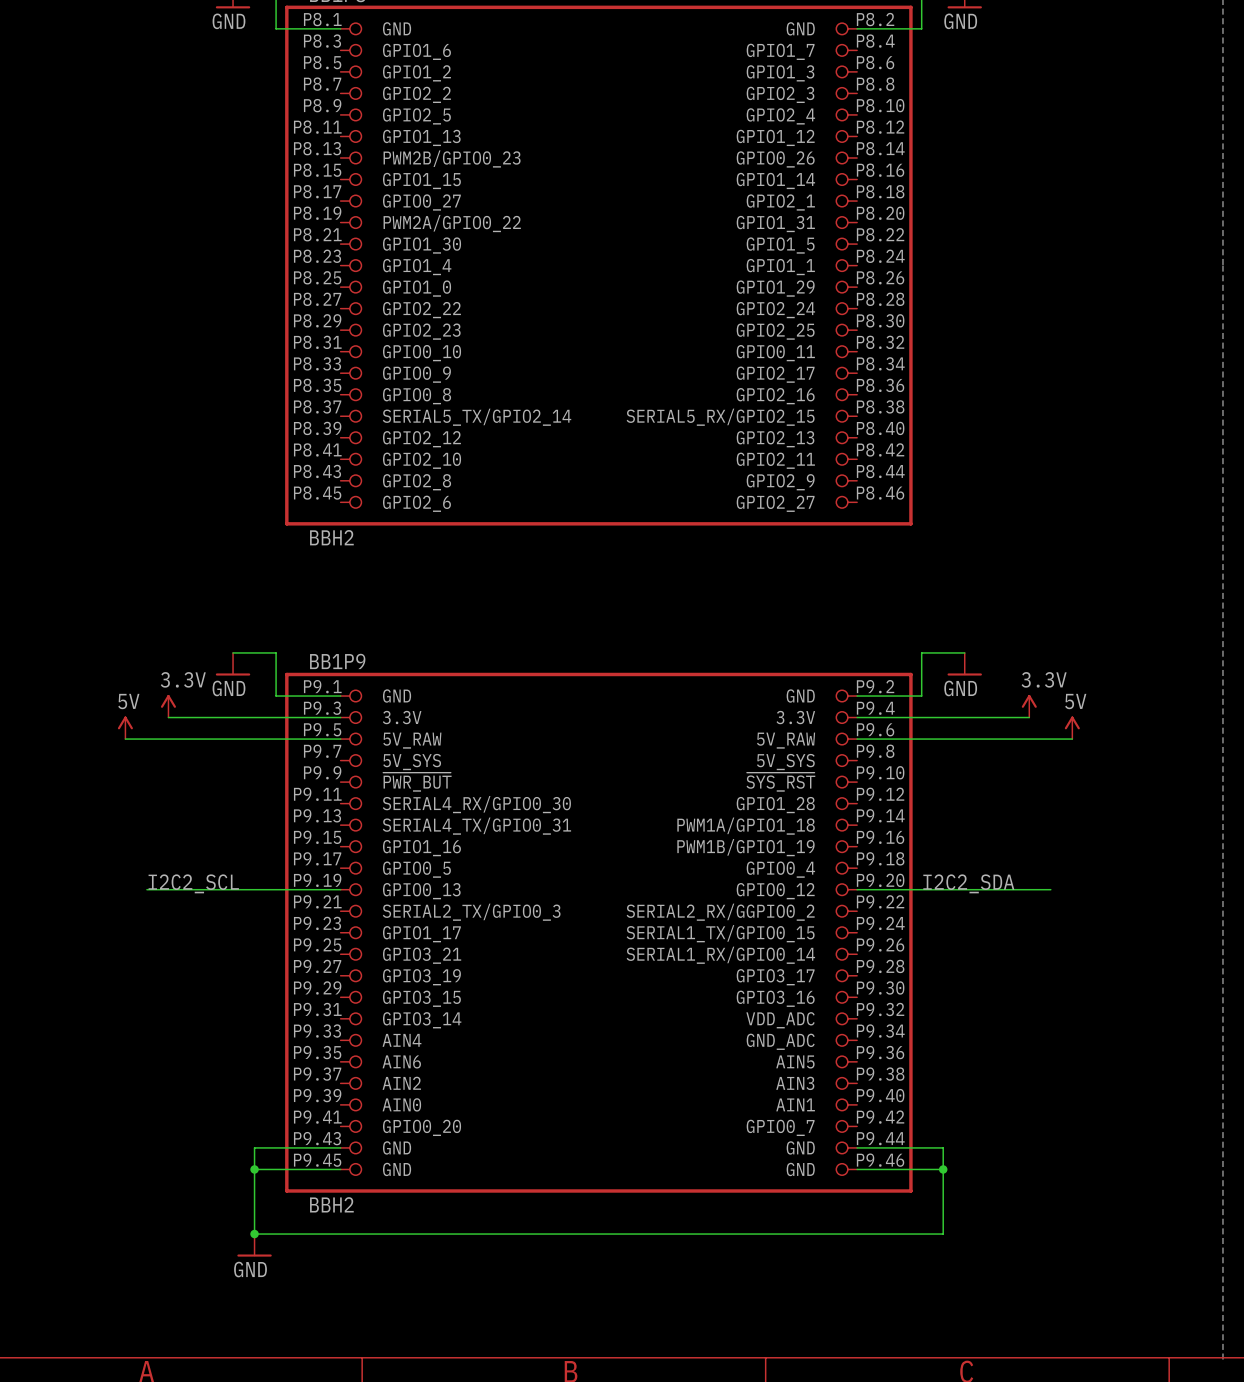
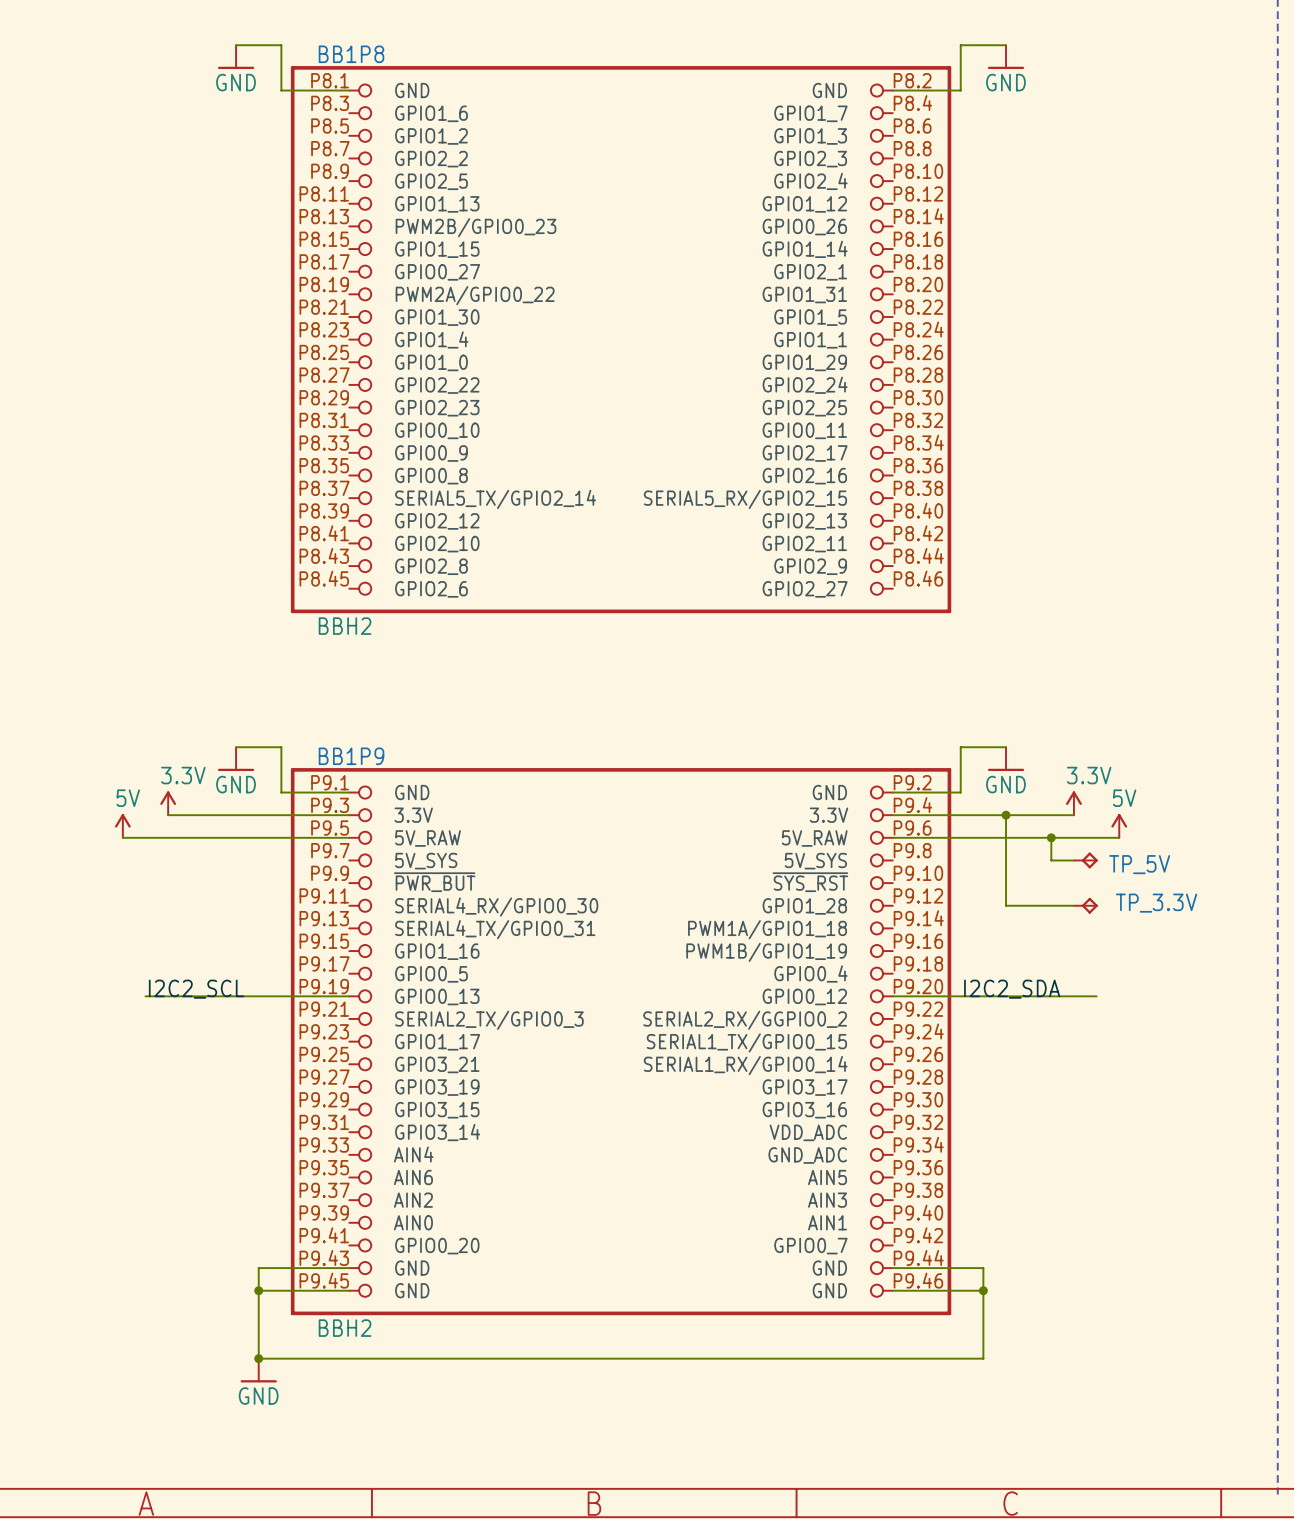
wire: none -> (1006, 815) (1006, 905) (1073, 905)
junction: none -> (1006, 815)
wire: none -> (1051, 837) (1051, 860) (1073, 860)
junction: none -> (1051, 837)
TP_5V: none -> (1085, 860)
TP_3.3V: none -> (1085, 905)

